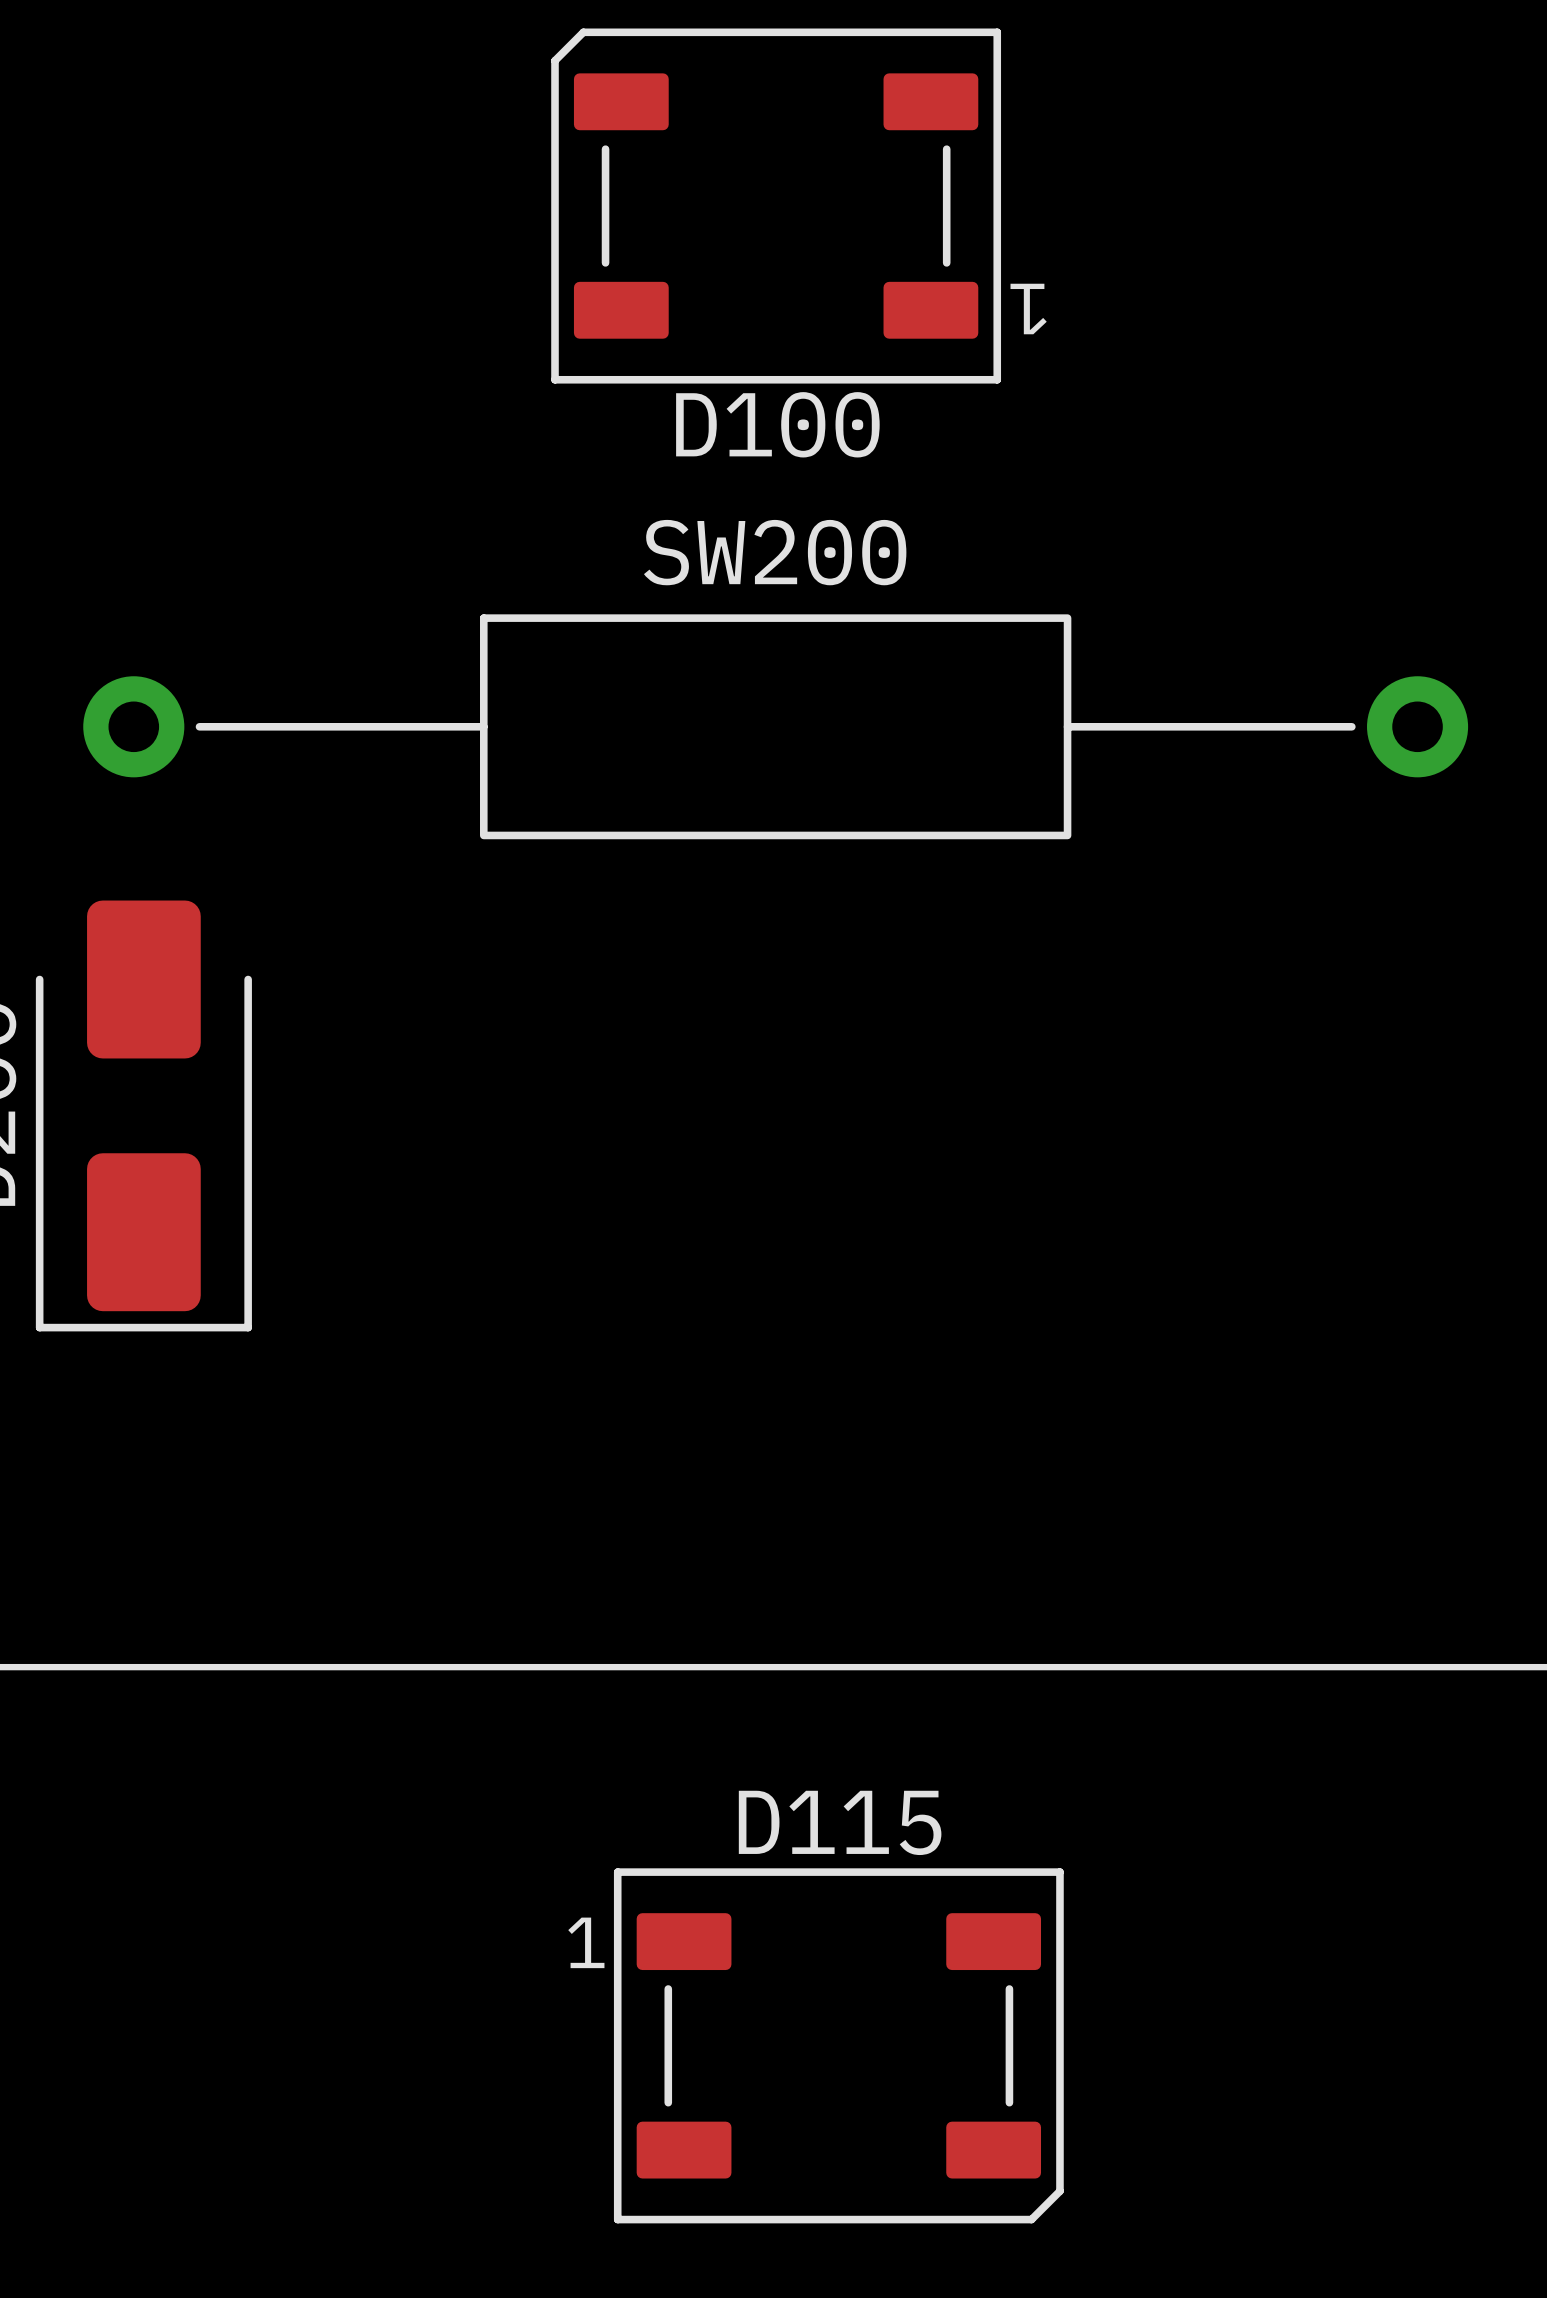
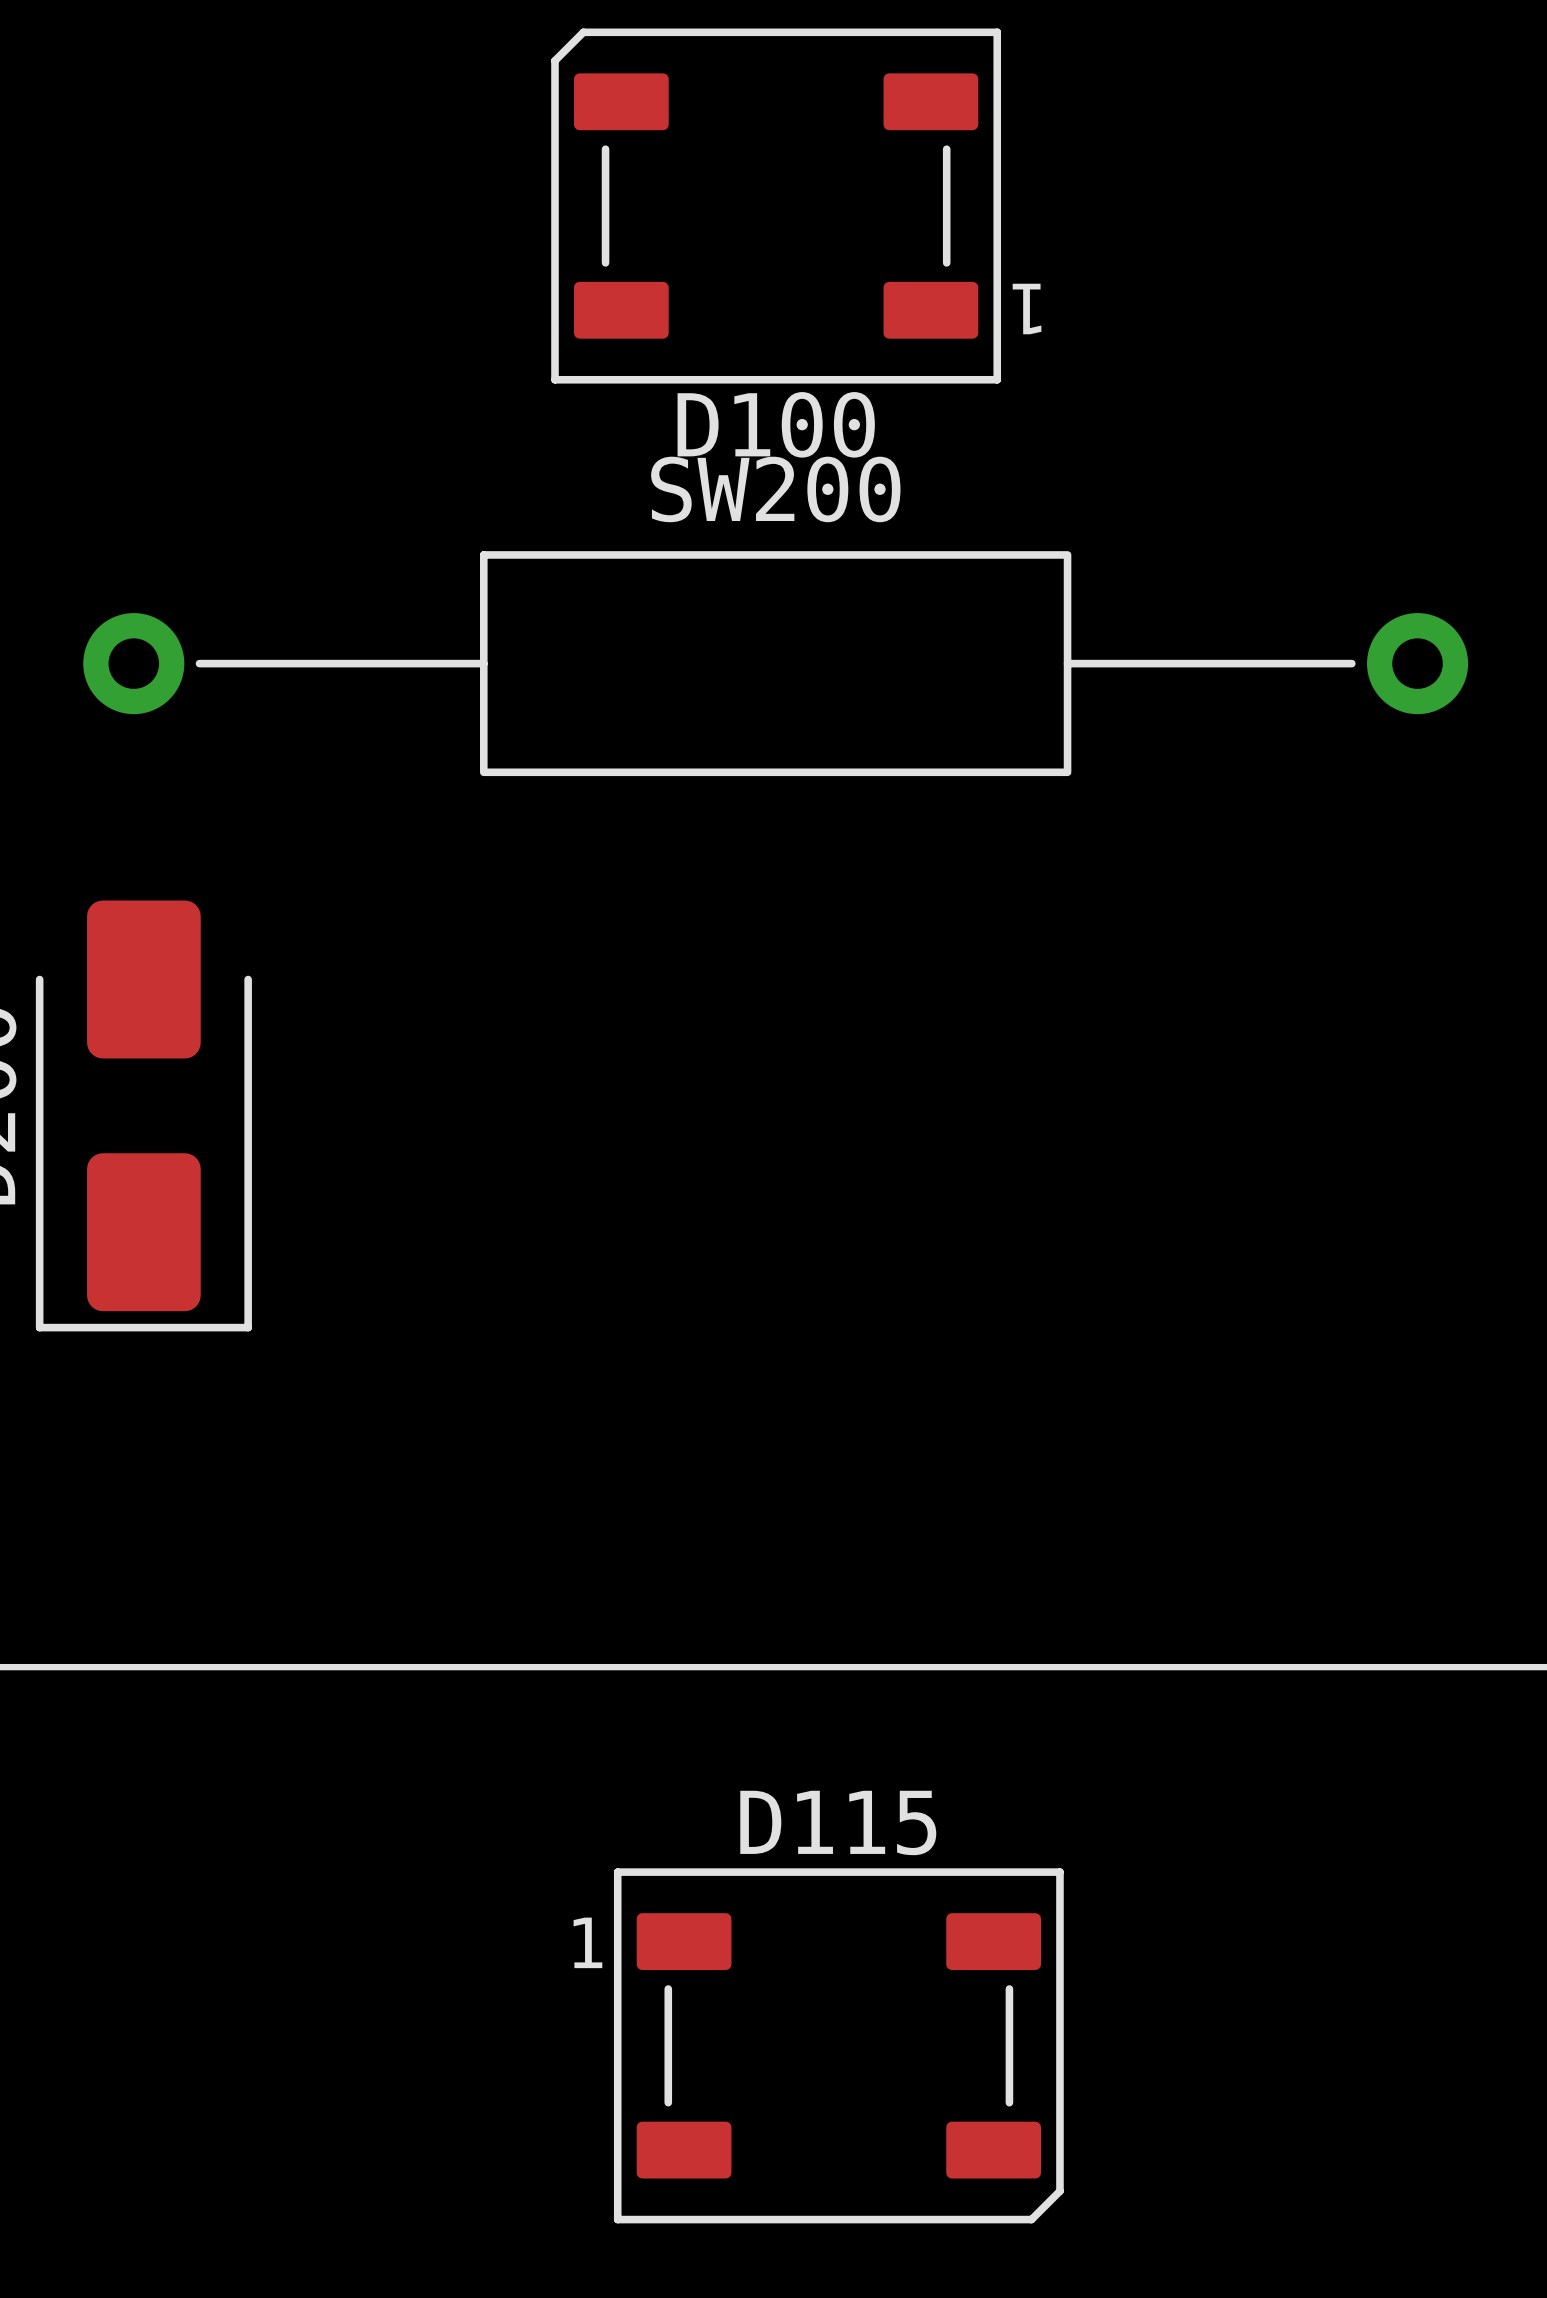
SW200 position: (775, 726) -> (775, 663)

